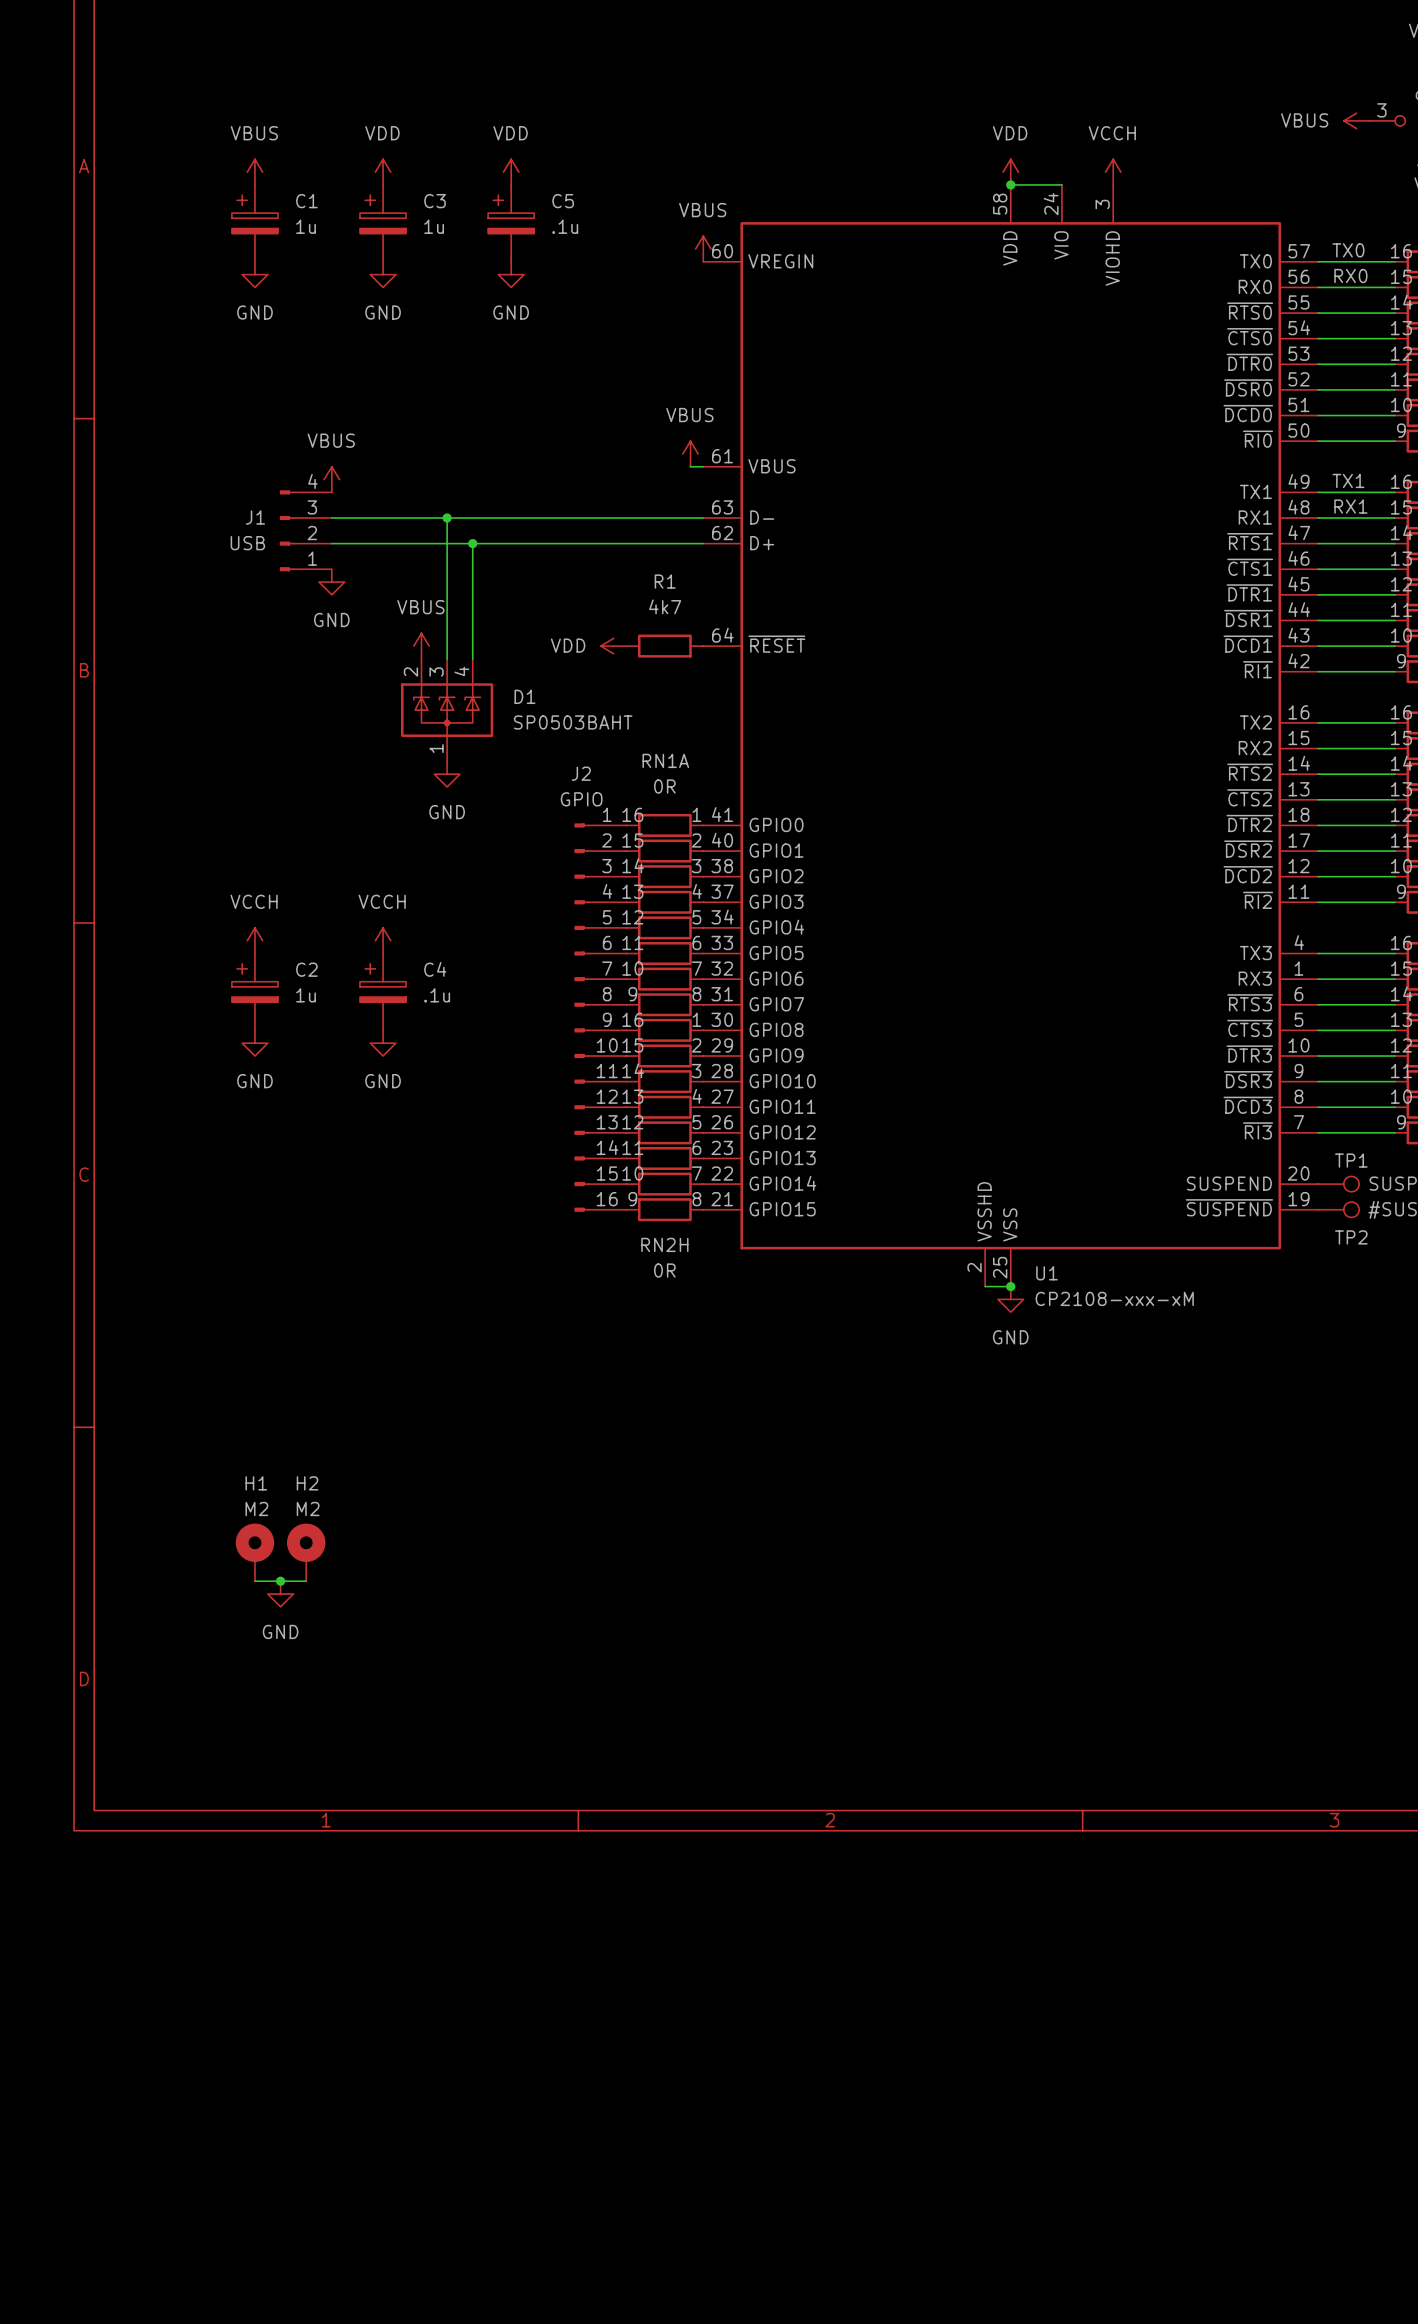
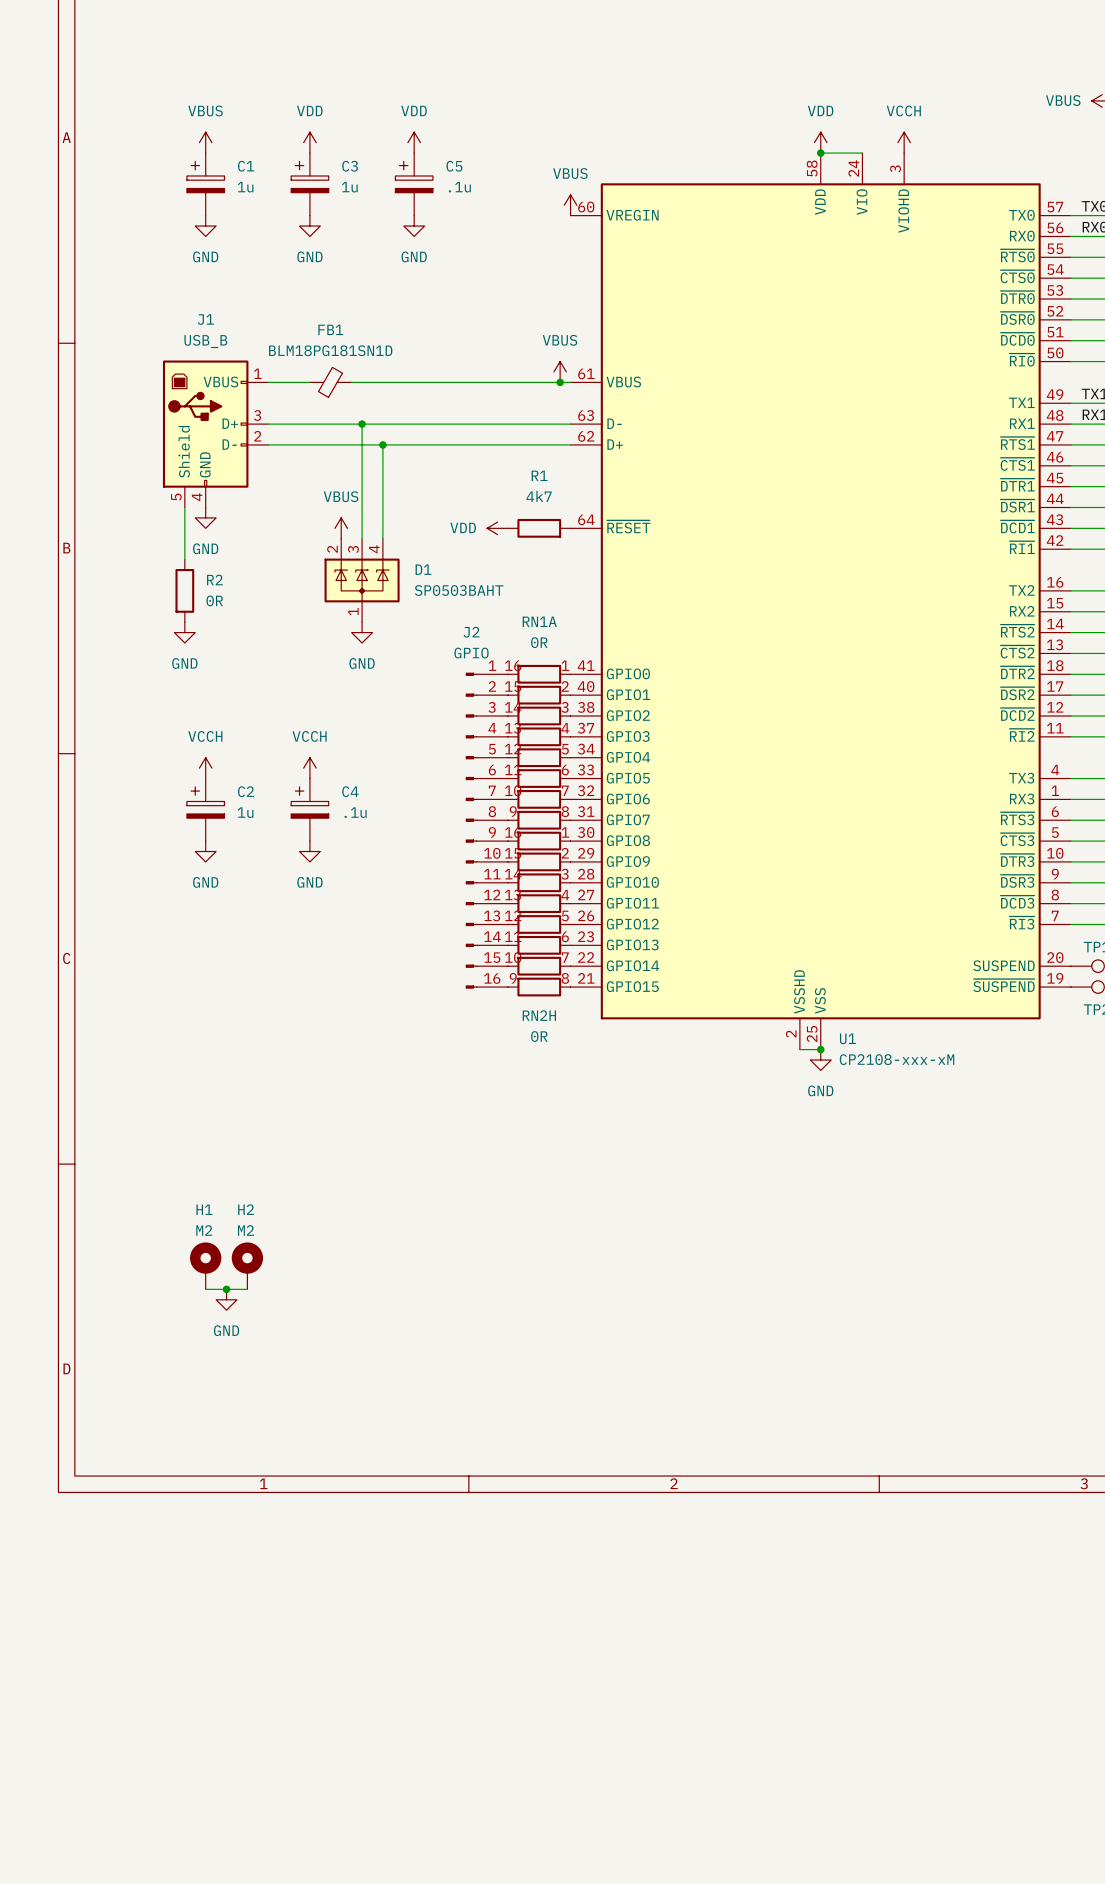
wire: none -> (268, 382) (309, 382)
FB1: none -> BLM18PG181SN1D (330, 382)
wire: none -> (351, 382) (560, 382)
junction: none -> (560, 382)
power symbol: VBUS (331, 479) -> none
J1 symbol: [279, 490, 332, 572] -> [162, 360, 269, 508]
J1 name position: J1 (255, 517) -> J1 (205, 319)
J1 value: USB (247, 543) -> USB_B (205, 341)
power symbol position: GND (331, 582) -> GND (205, 517)
wire: none -> (184, 507) (184, 559)
R2: none -> 0R (184, 590)
power symbol: none -> GND (184, 632)

